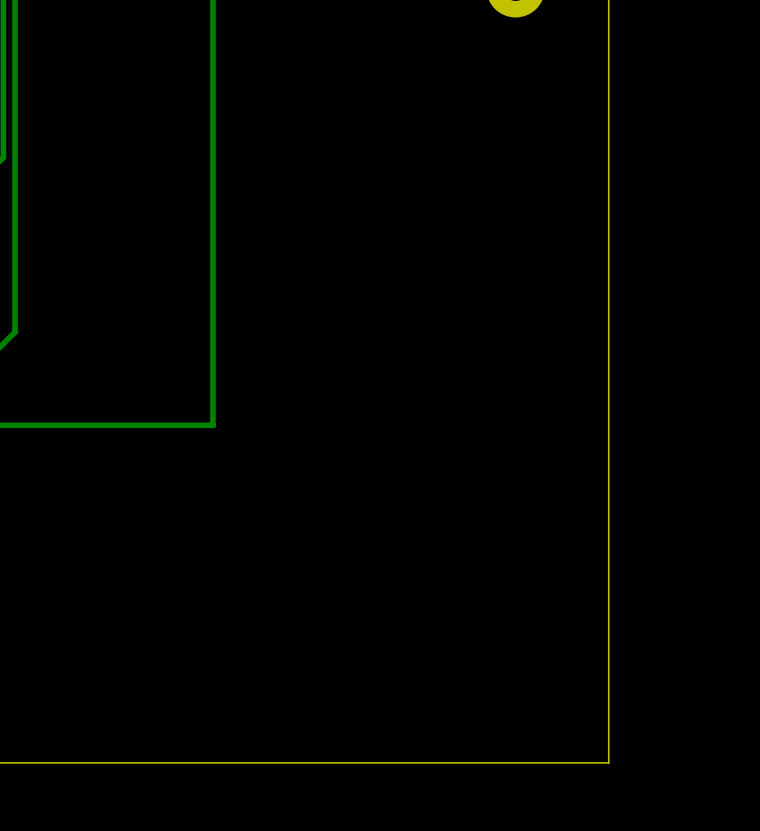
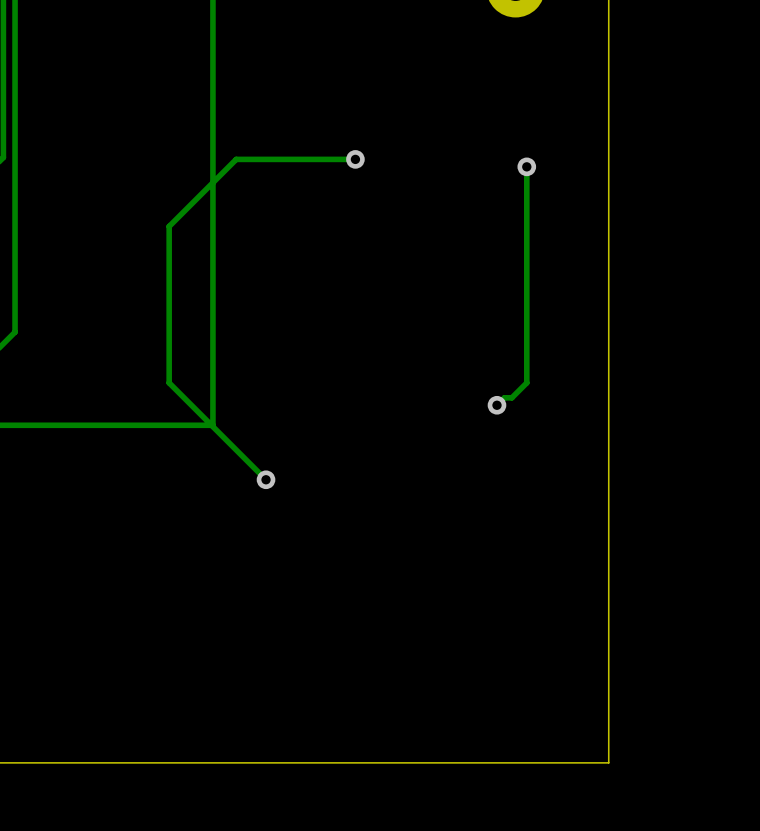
track: none -> (355, 159) (236, 159) (169, 226) (169, 382) (266, 479)
via: none -> (355, 159)
track: none -> (526, 166) (526, 382) (511, 397) (504, 397) (496, 405)
via: none -> (526, 166)
via: none -> (496, 405)
via: none -> (266, 479)

